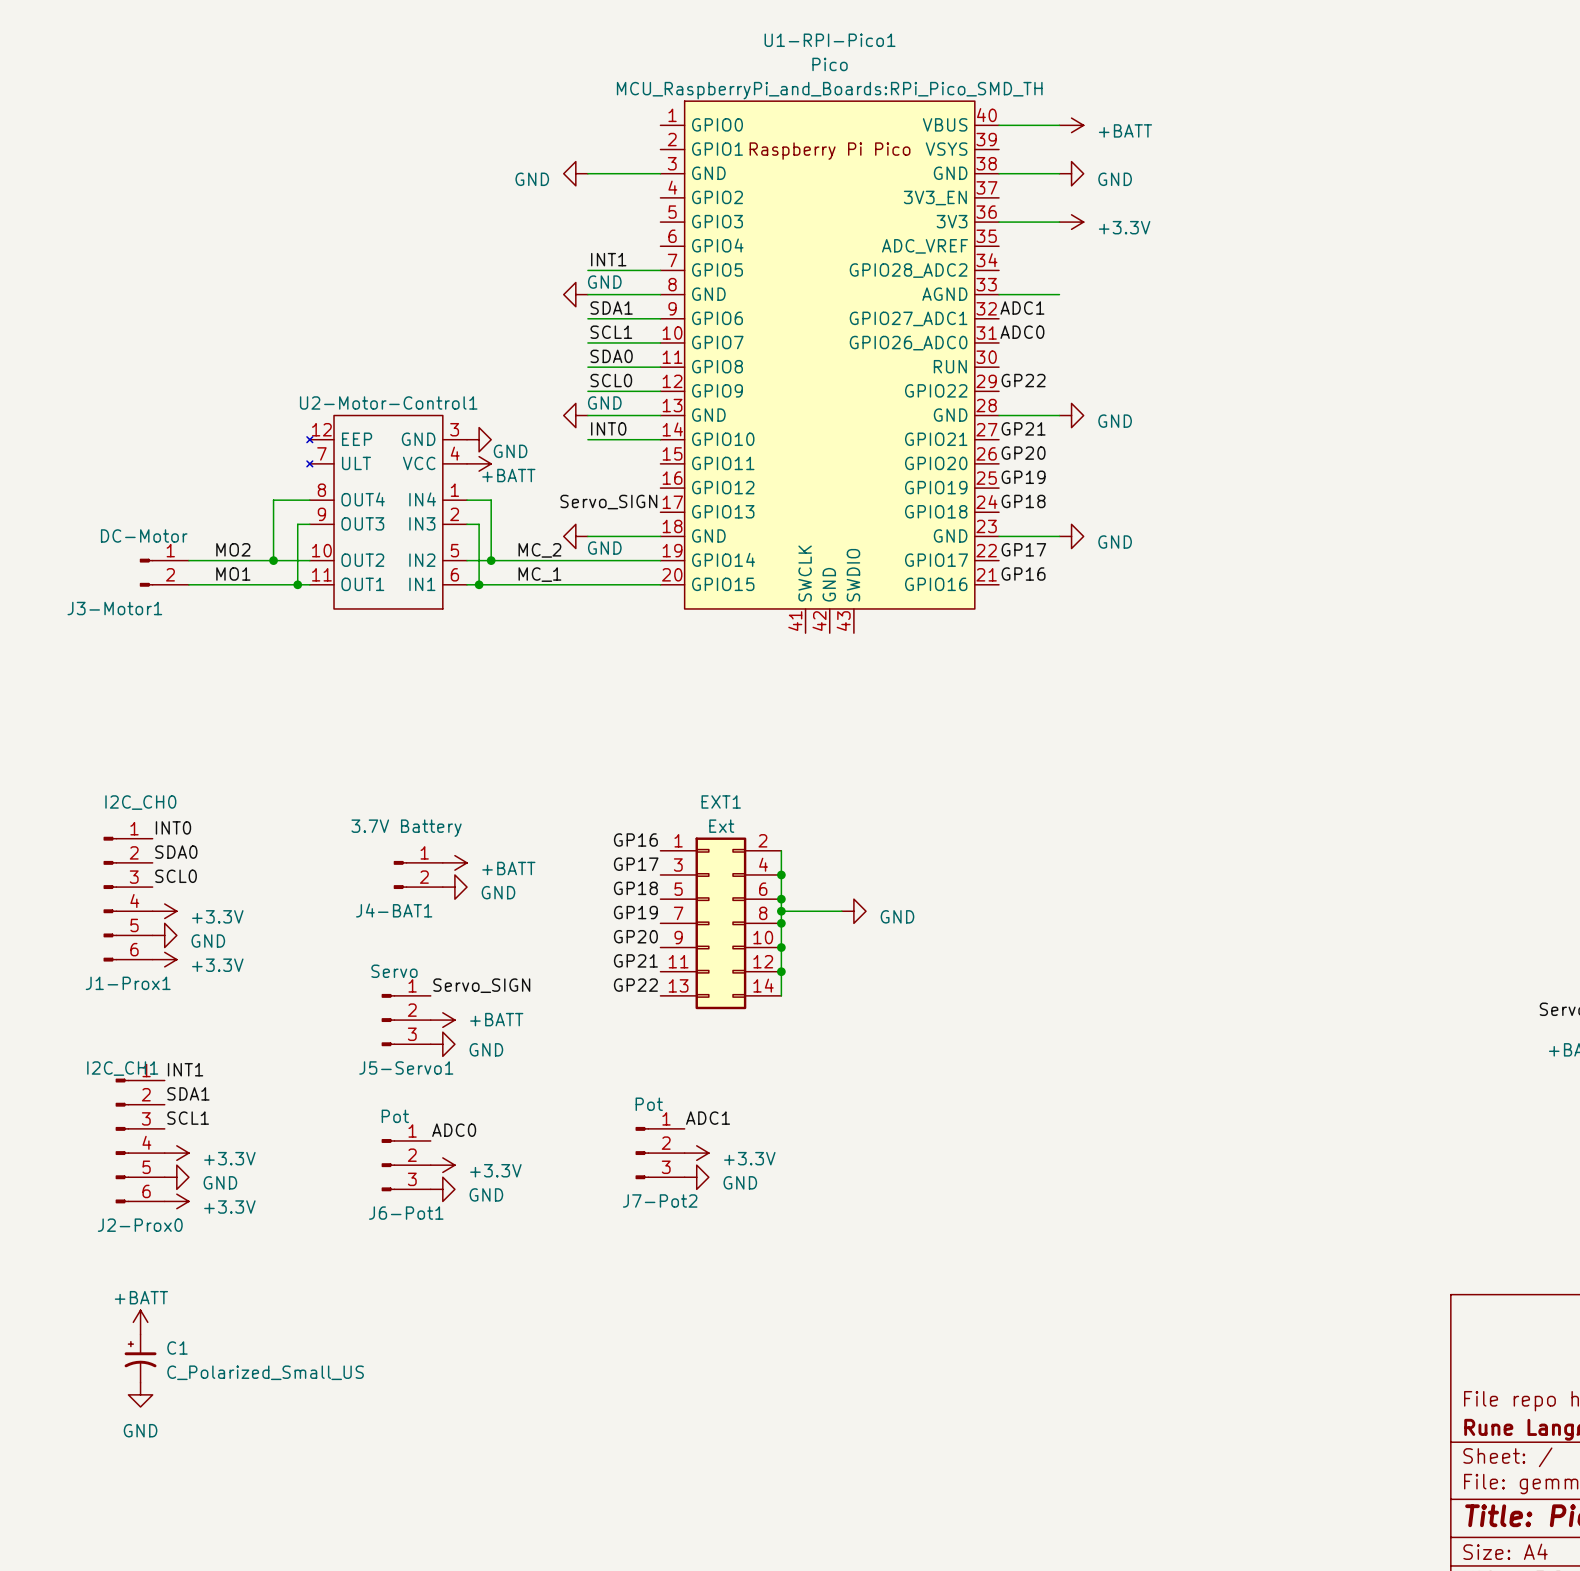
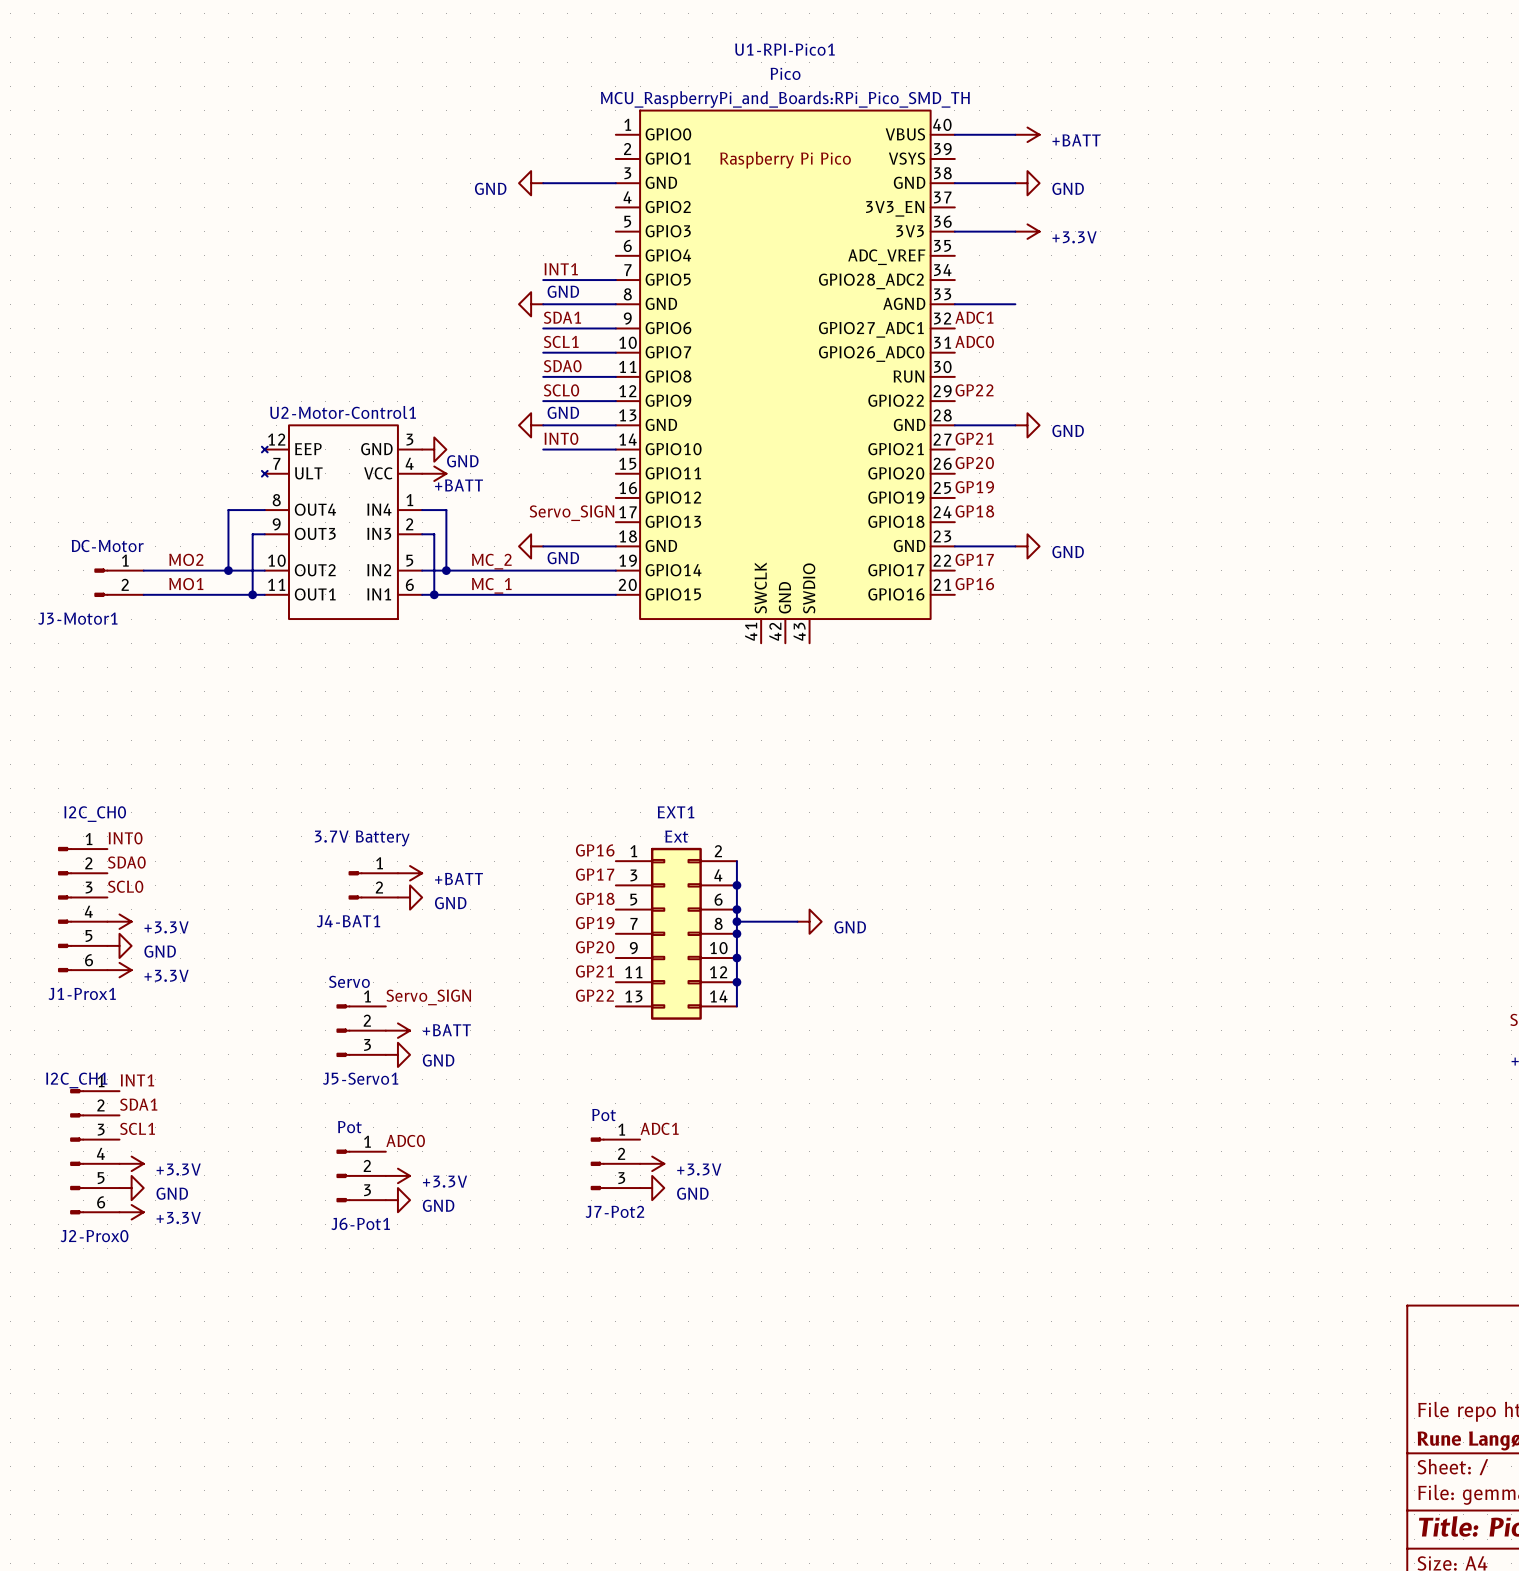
power symbol: +BATT (140, 1322) -> none
C1: C_Polarized_Small_US (140, 1358) -> none
power symbol: GND (140, 1394) -> none

